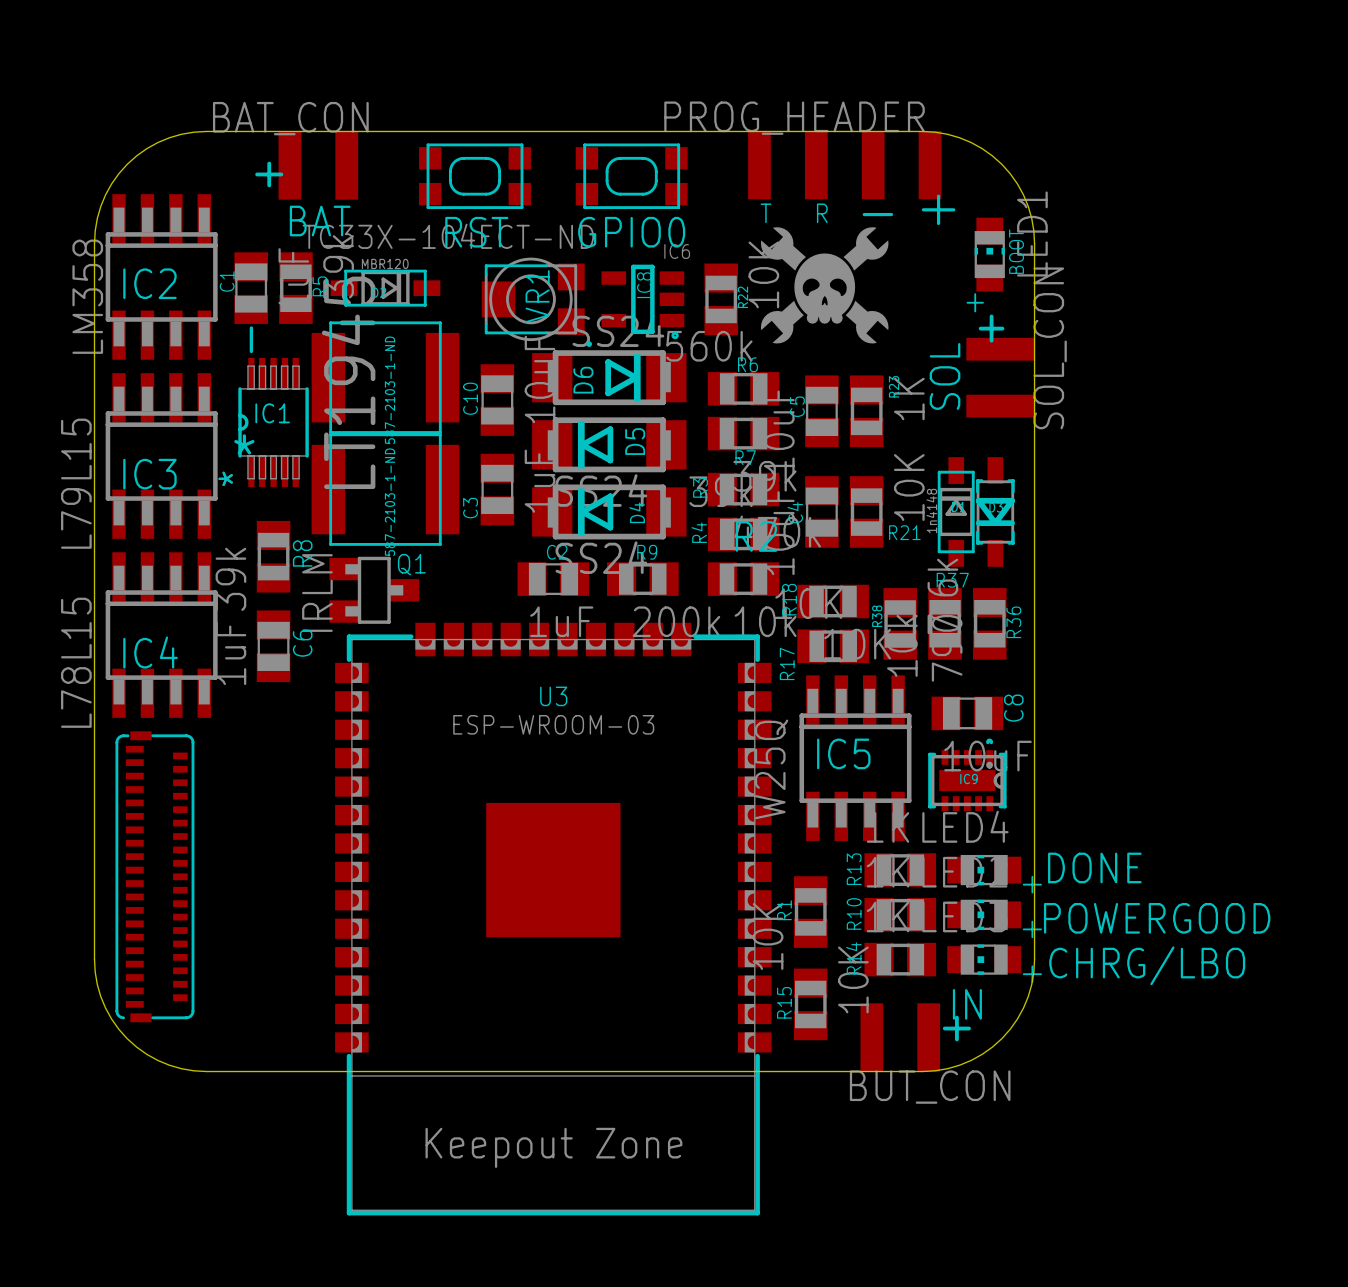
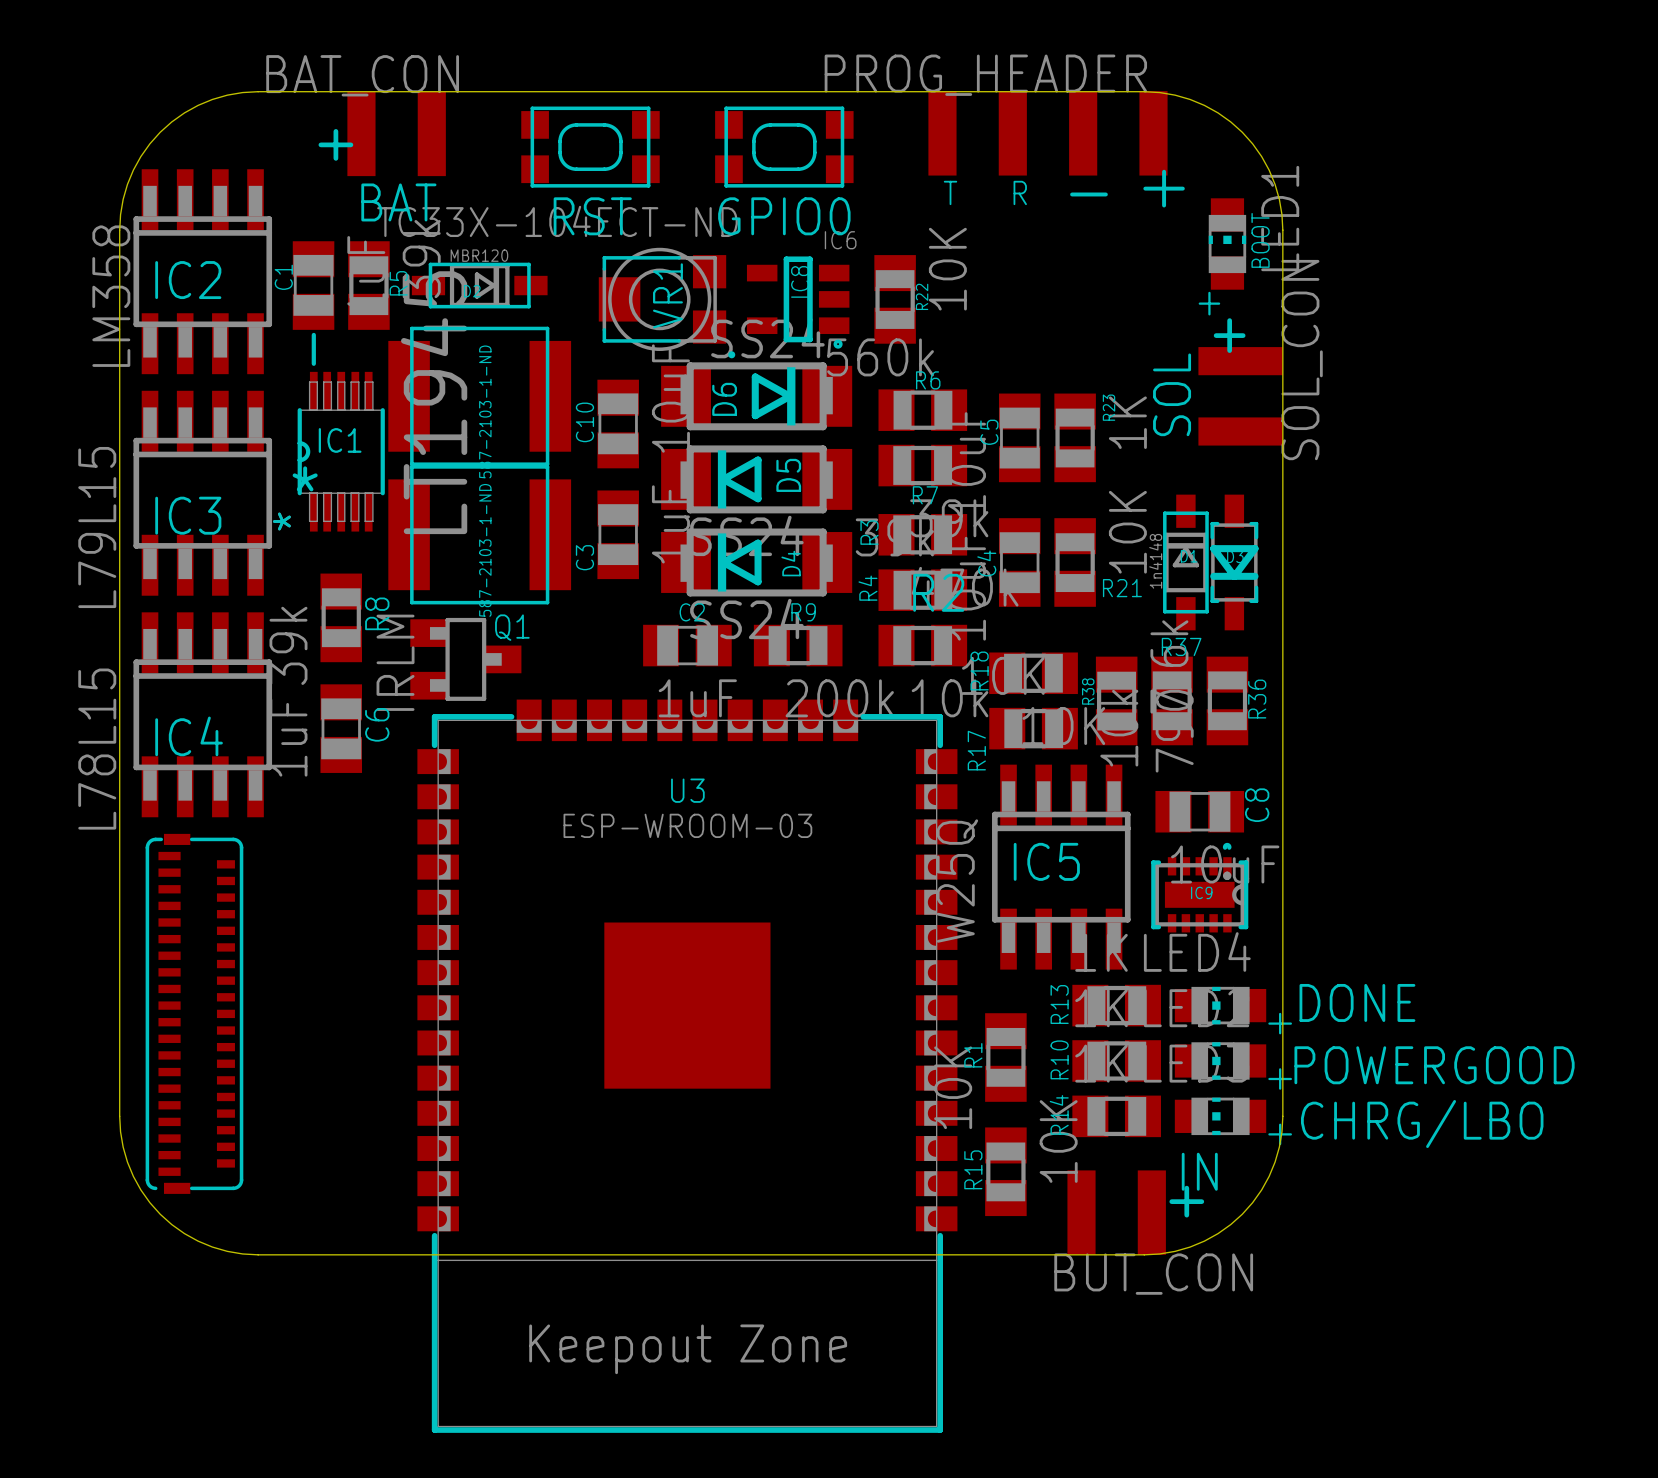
drawing: [760, 227, 889, 344] -> none

